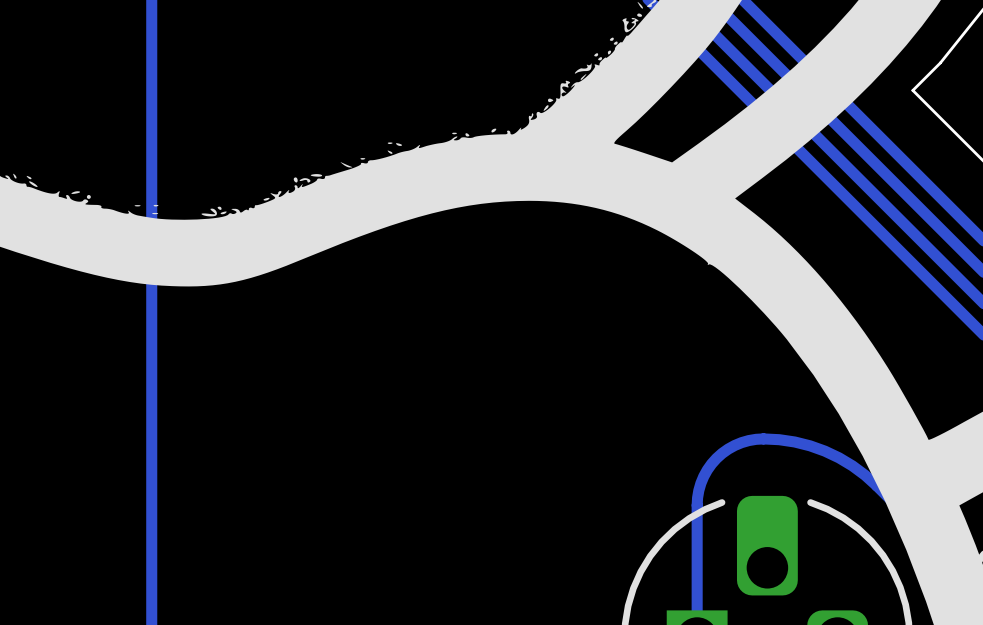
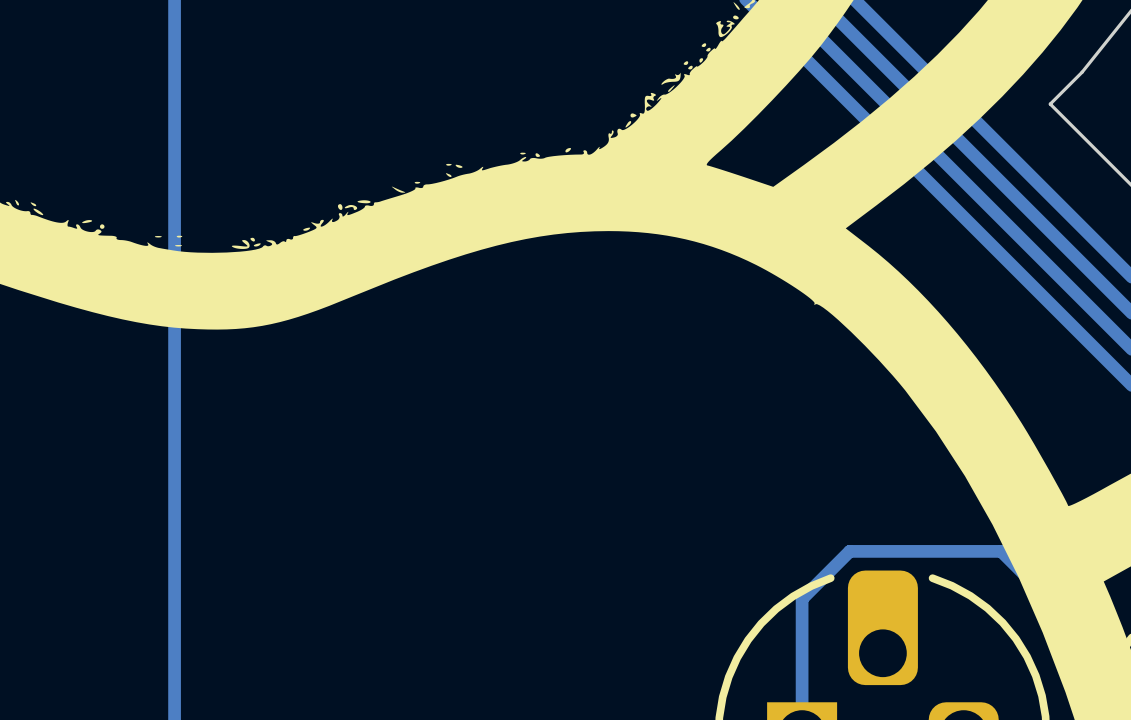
track: (876, 485) (852, 465) (839, 457) (810, 445) (779, 439) (748, 440) (728, 449) (716, 458) (707, 469) (698, 490) (697, 520) -> (1008, 558) (1001, 551) (849, 551) (802, 599)

